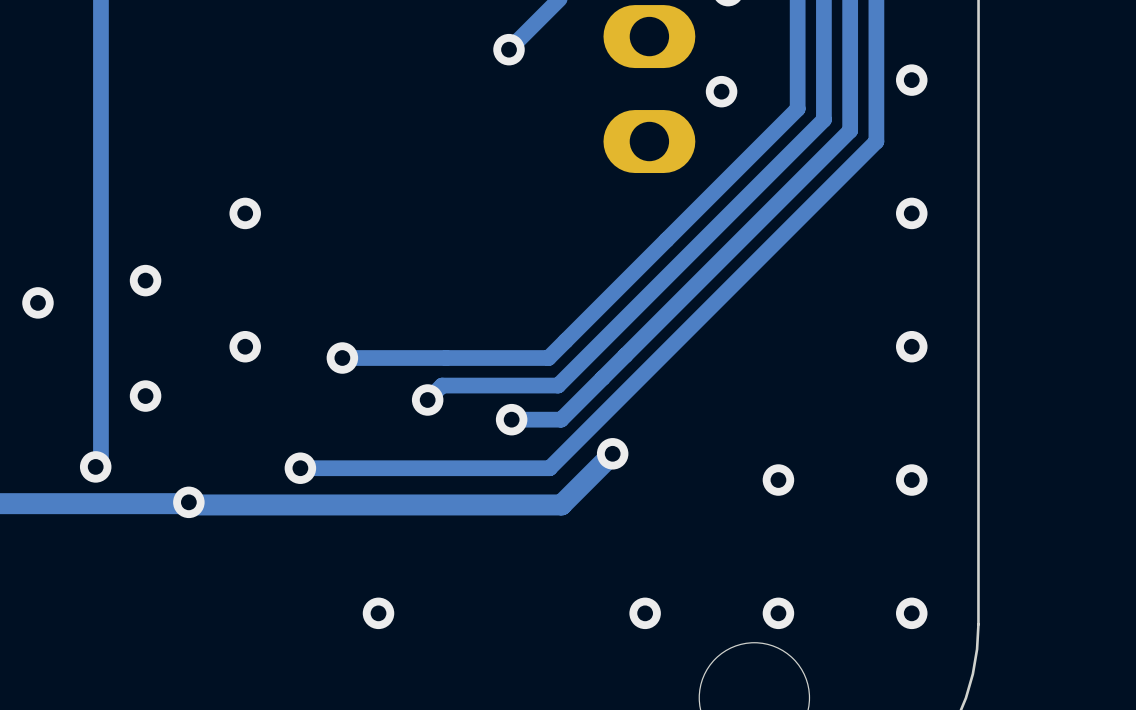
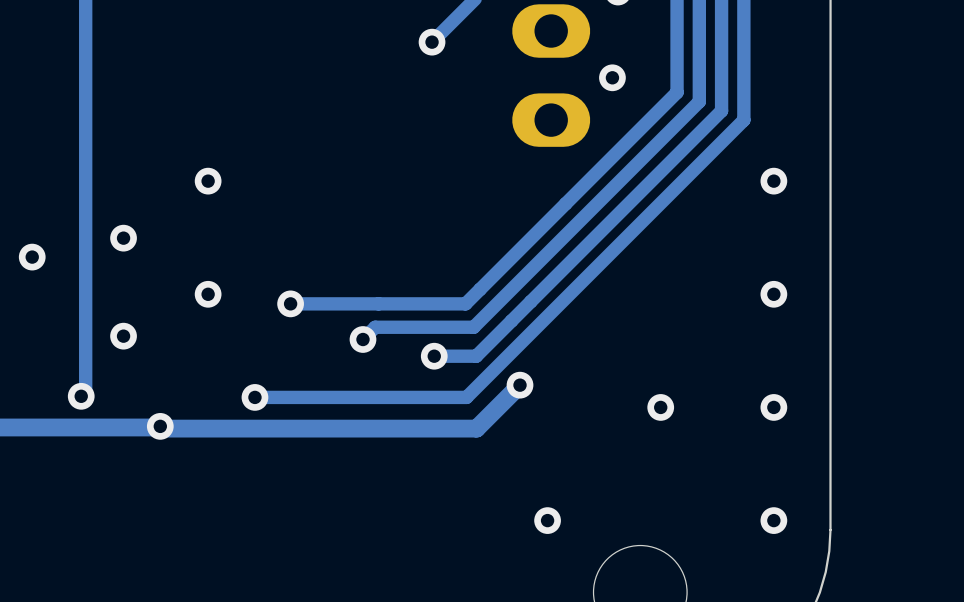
via: (911, 80) -> none
via: (378, 613) -> none
via: (778, 613) -> none

